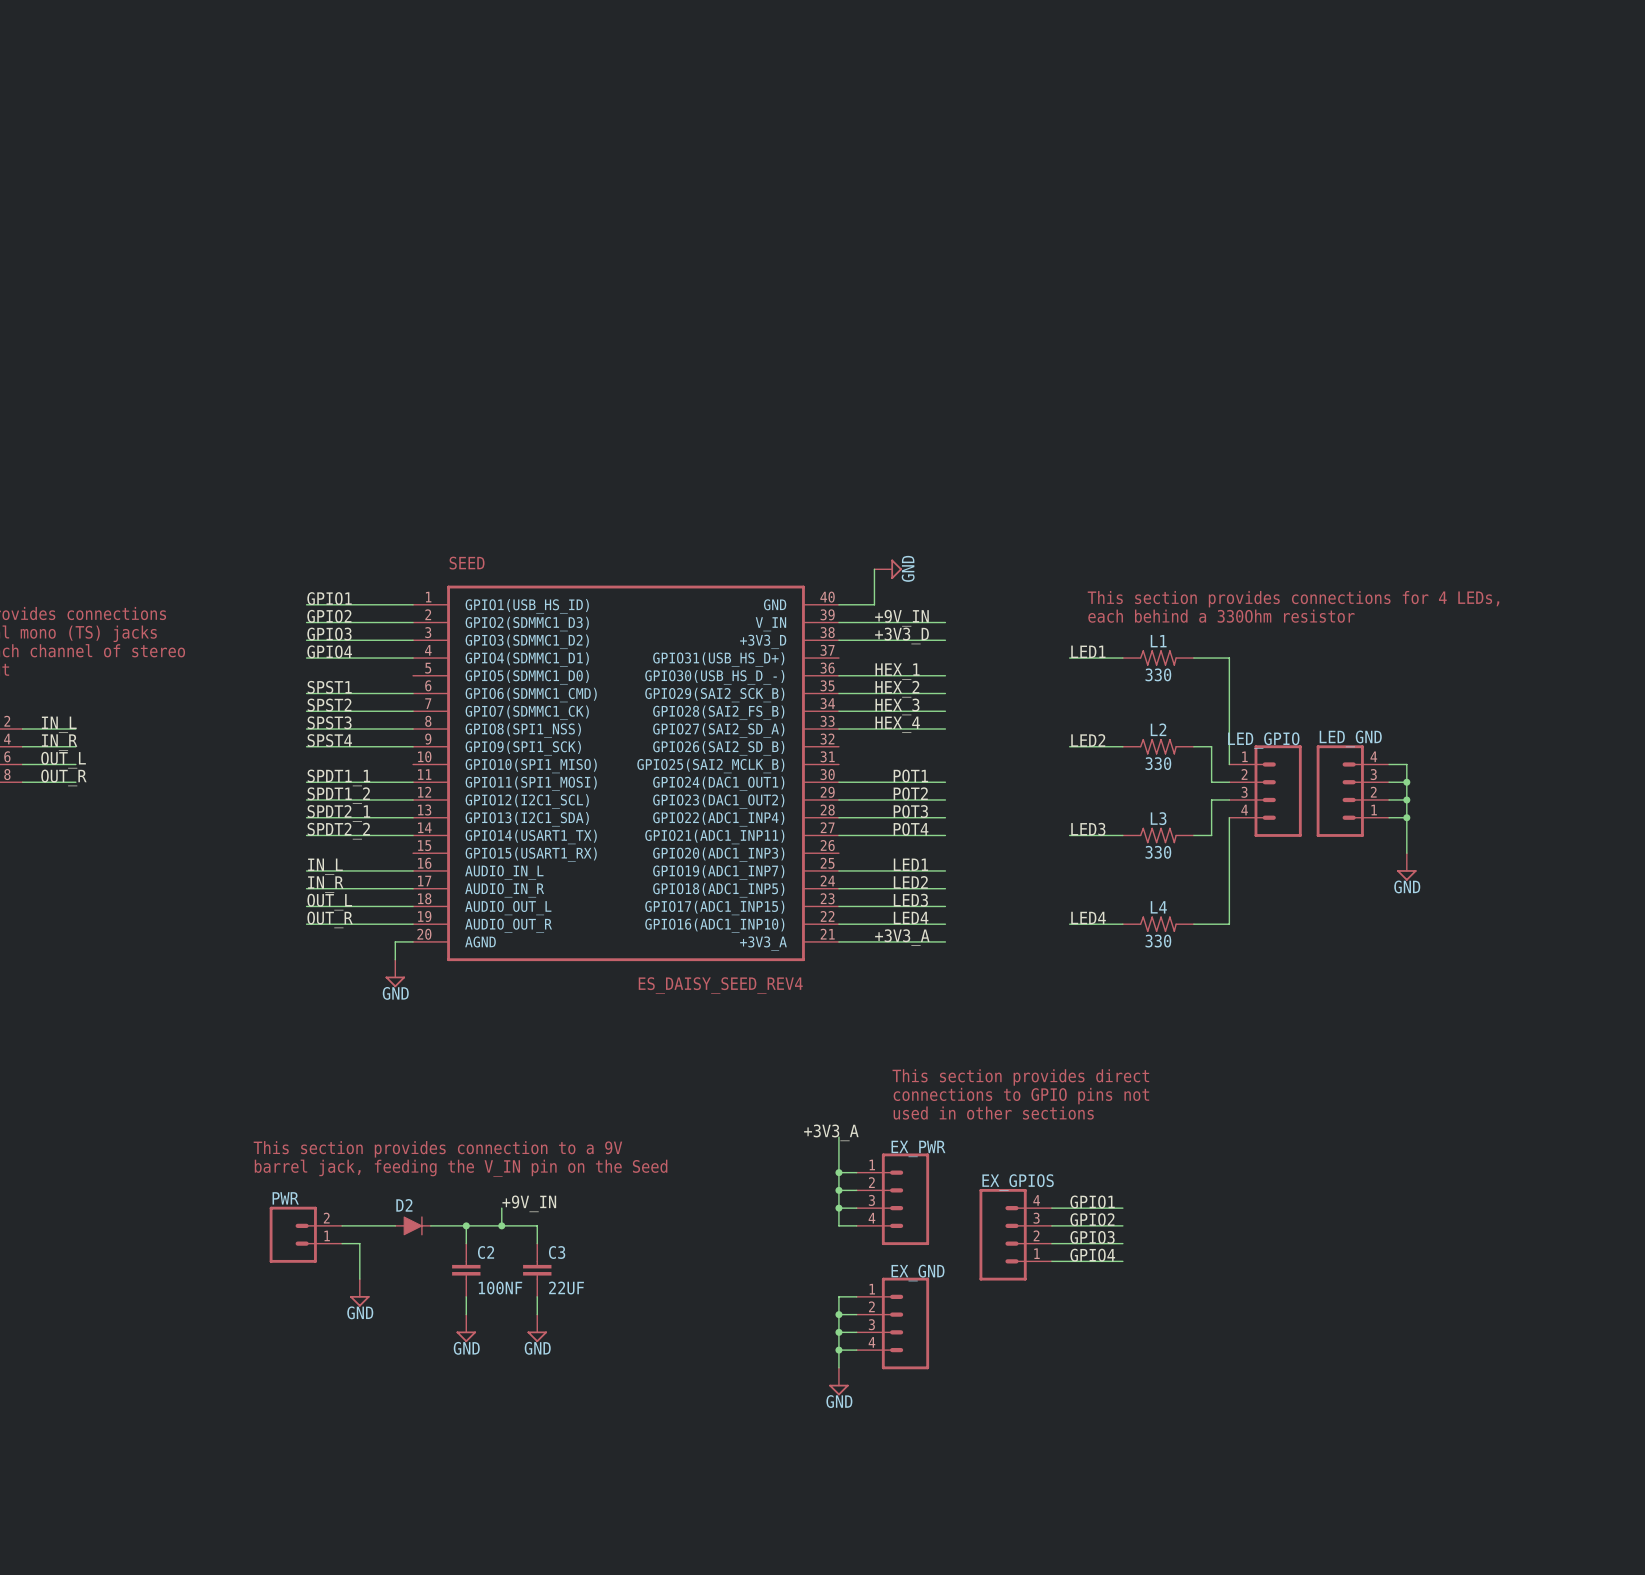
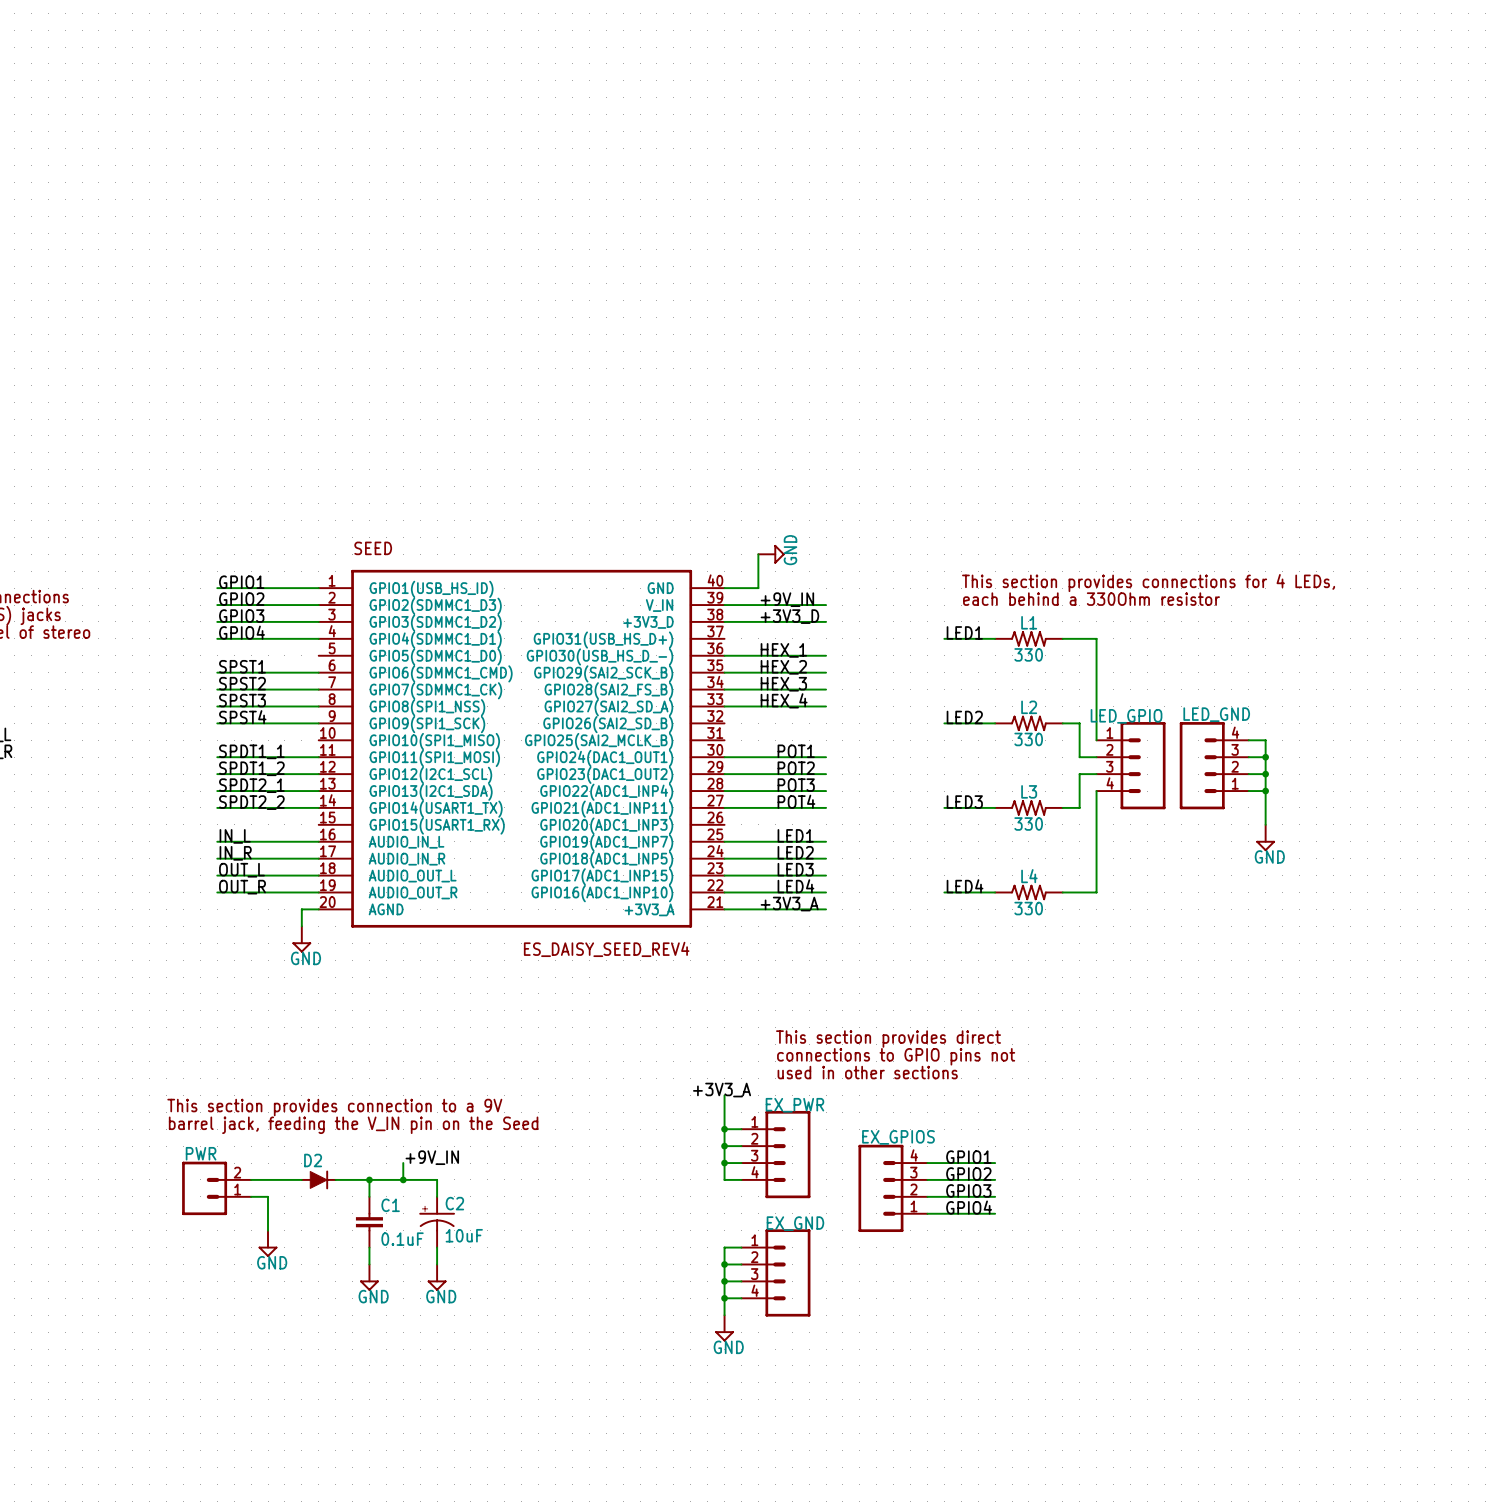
C2 name: C2 (486, 1252) -> C1 (390, 1205)
C3: 22UF (537, 1270) -> none
C2: none -> 10uF (437, 1222)
C2 value: 100NF (500, 1288) -> 0.1uF (402, 1239)

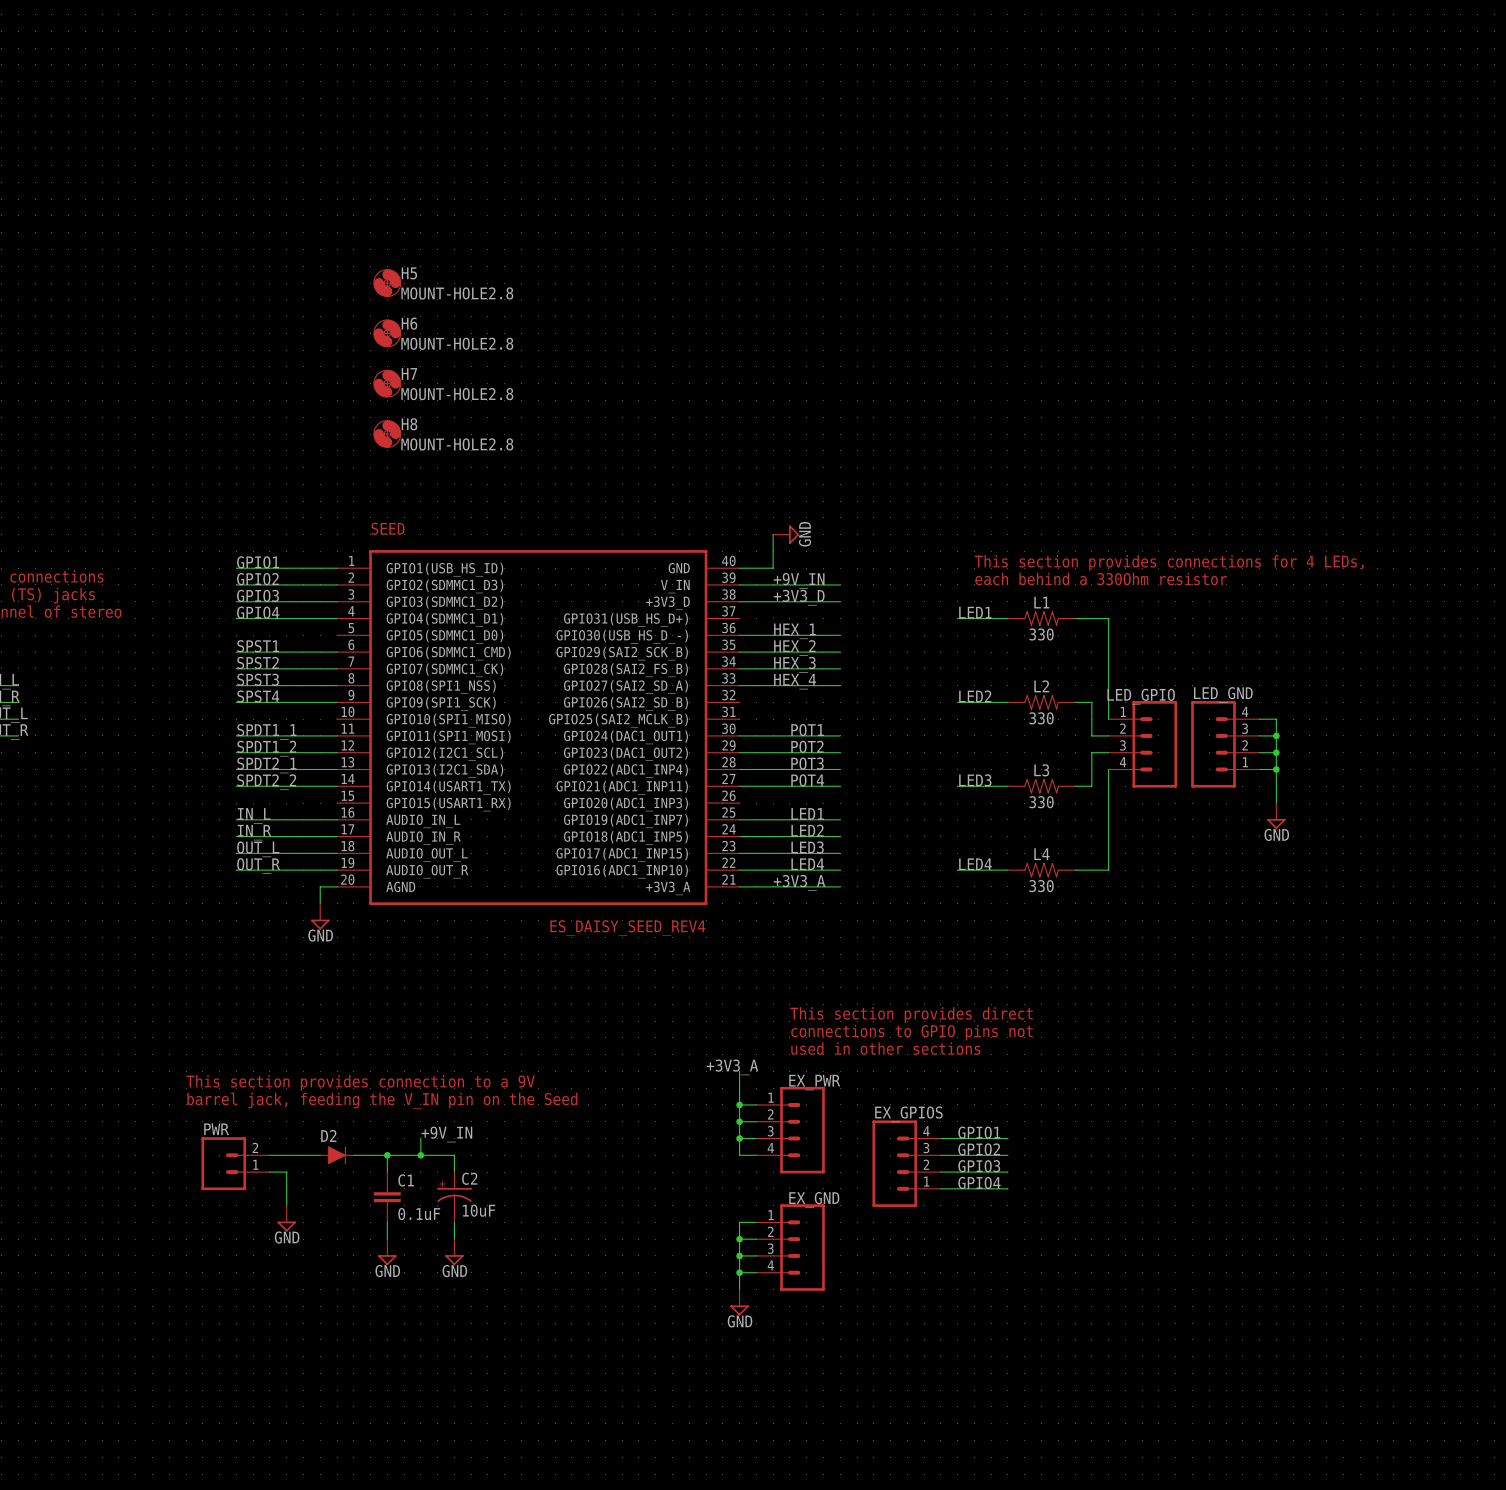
H5: none -> MOUNT-HOLE2.8 (387, 283)
H6: none -> MOUNT-HOLE2.8 (387, 333)
H7: none -> MOUNT-HOLE2.8 (387, 383)
H8: none -> MOUNT-HOLE2.8 (387, 434)

